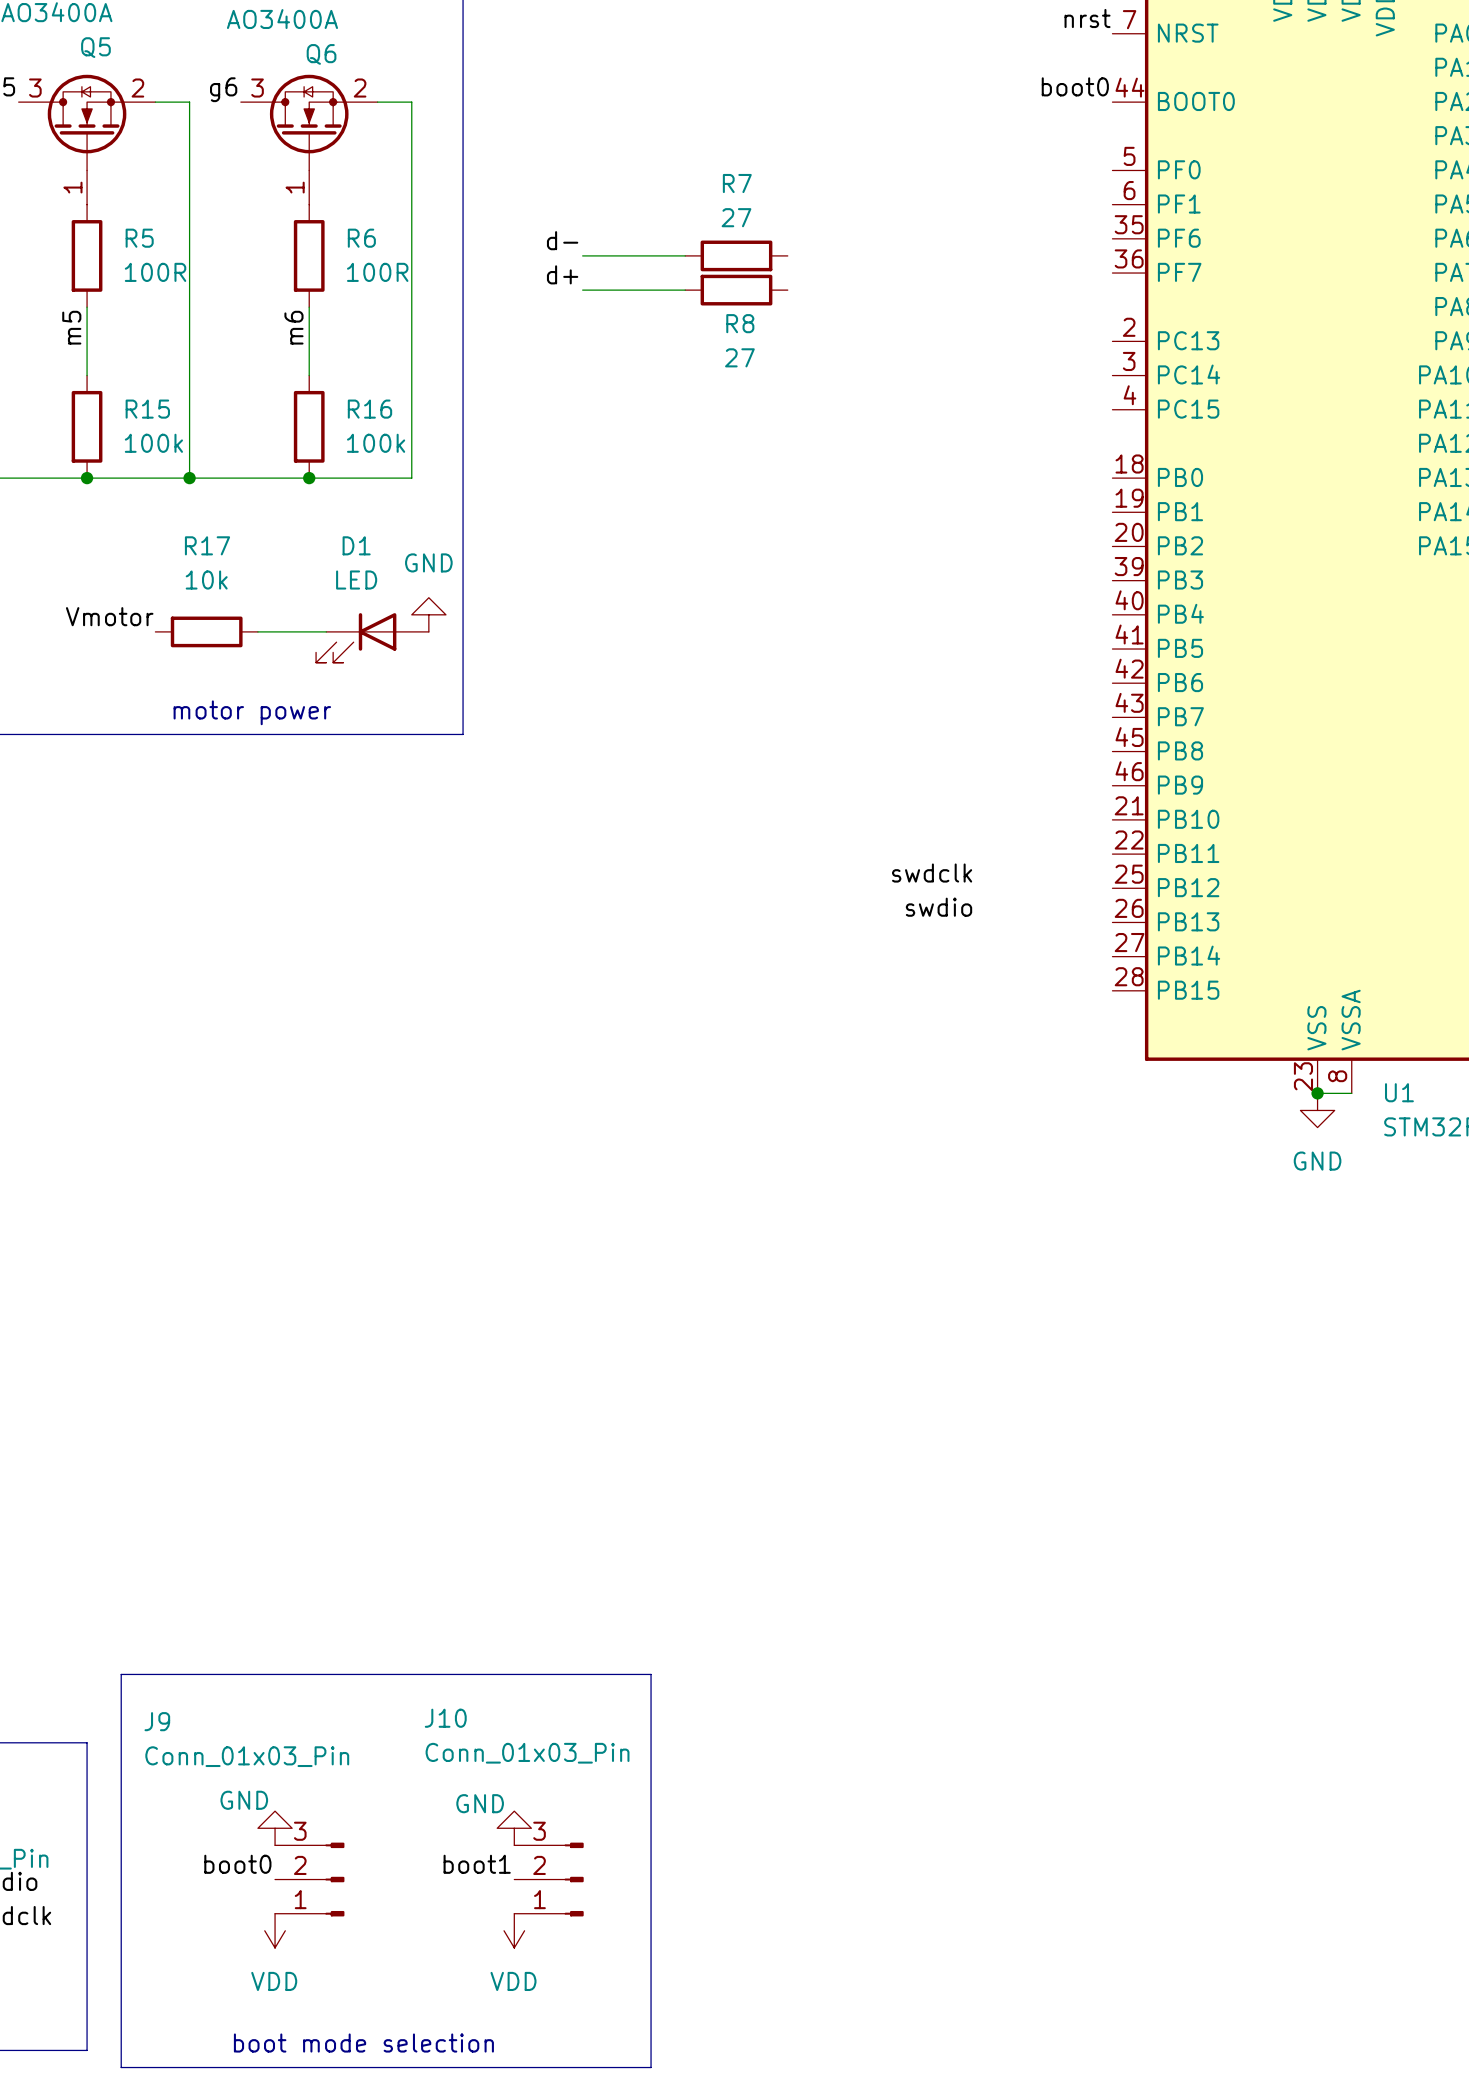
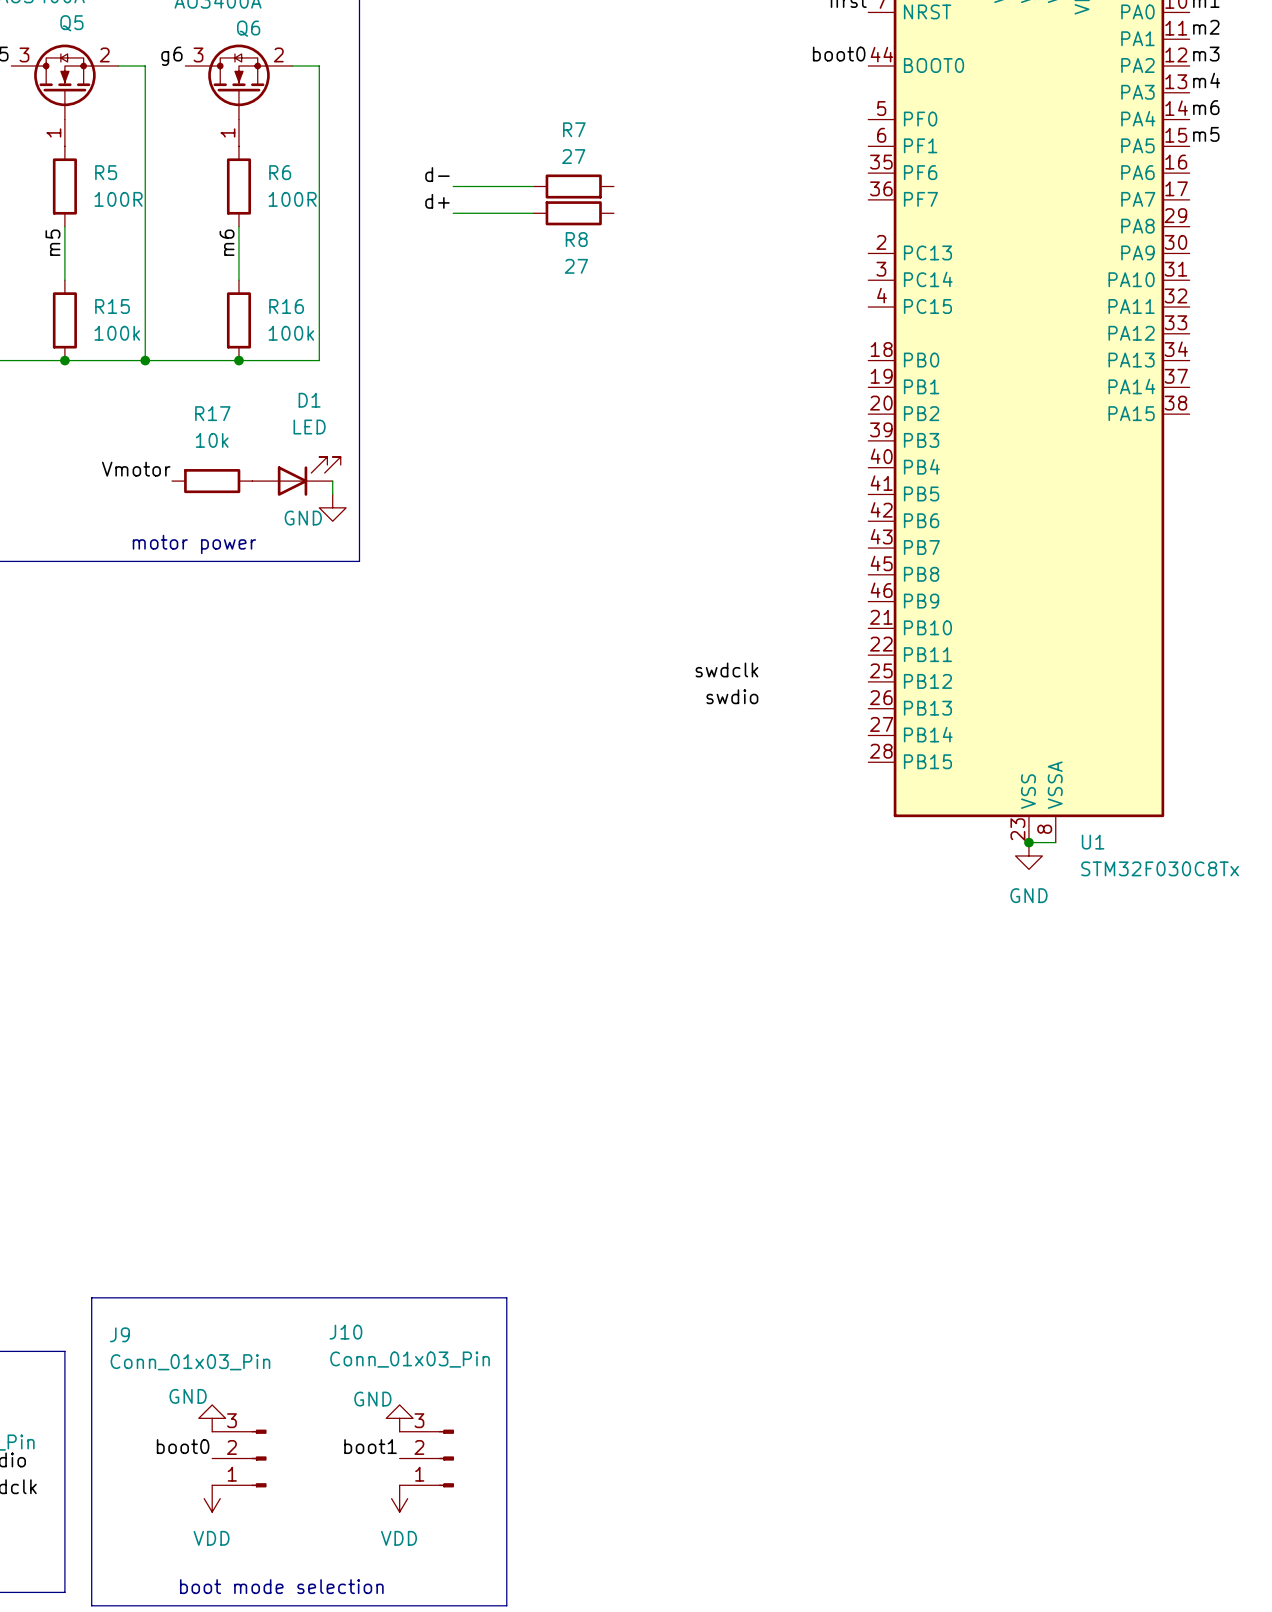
D1 name position: D1 (356, 545) -> D1 (309, 400)
power symbol text position: GND (428, 562) -> GND (303, 518)
D1 value position: LED (356, 580) -> LED (309, 427)
power symbol rotation: 0° (428, 614) -> 180° (332, 507)
power symbol position: GND (428, 614) -> GND (332, 507)
label position: Vmotor (109, 616) -> Vmotor (136, 469)
R17 position: (206, 631) -> (212, 481)
wire: (257, 631) (326, 631) -> none
wire: none -> (332, 481) (332, 494)
D1 rotation: 0° (356, 637) -> 180° (309, 476)

